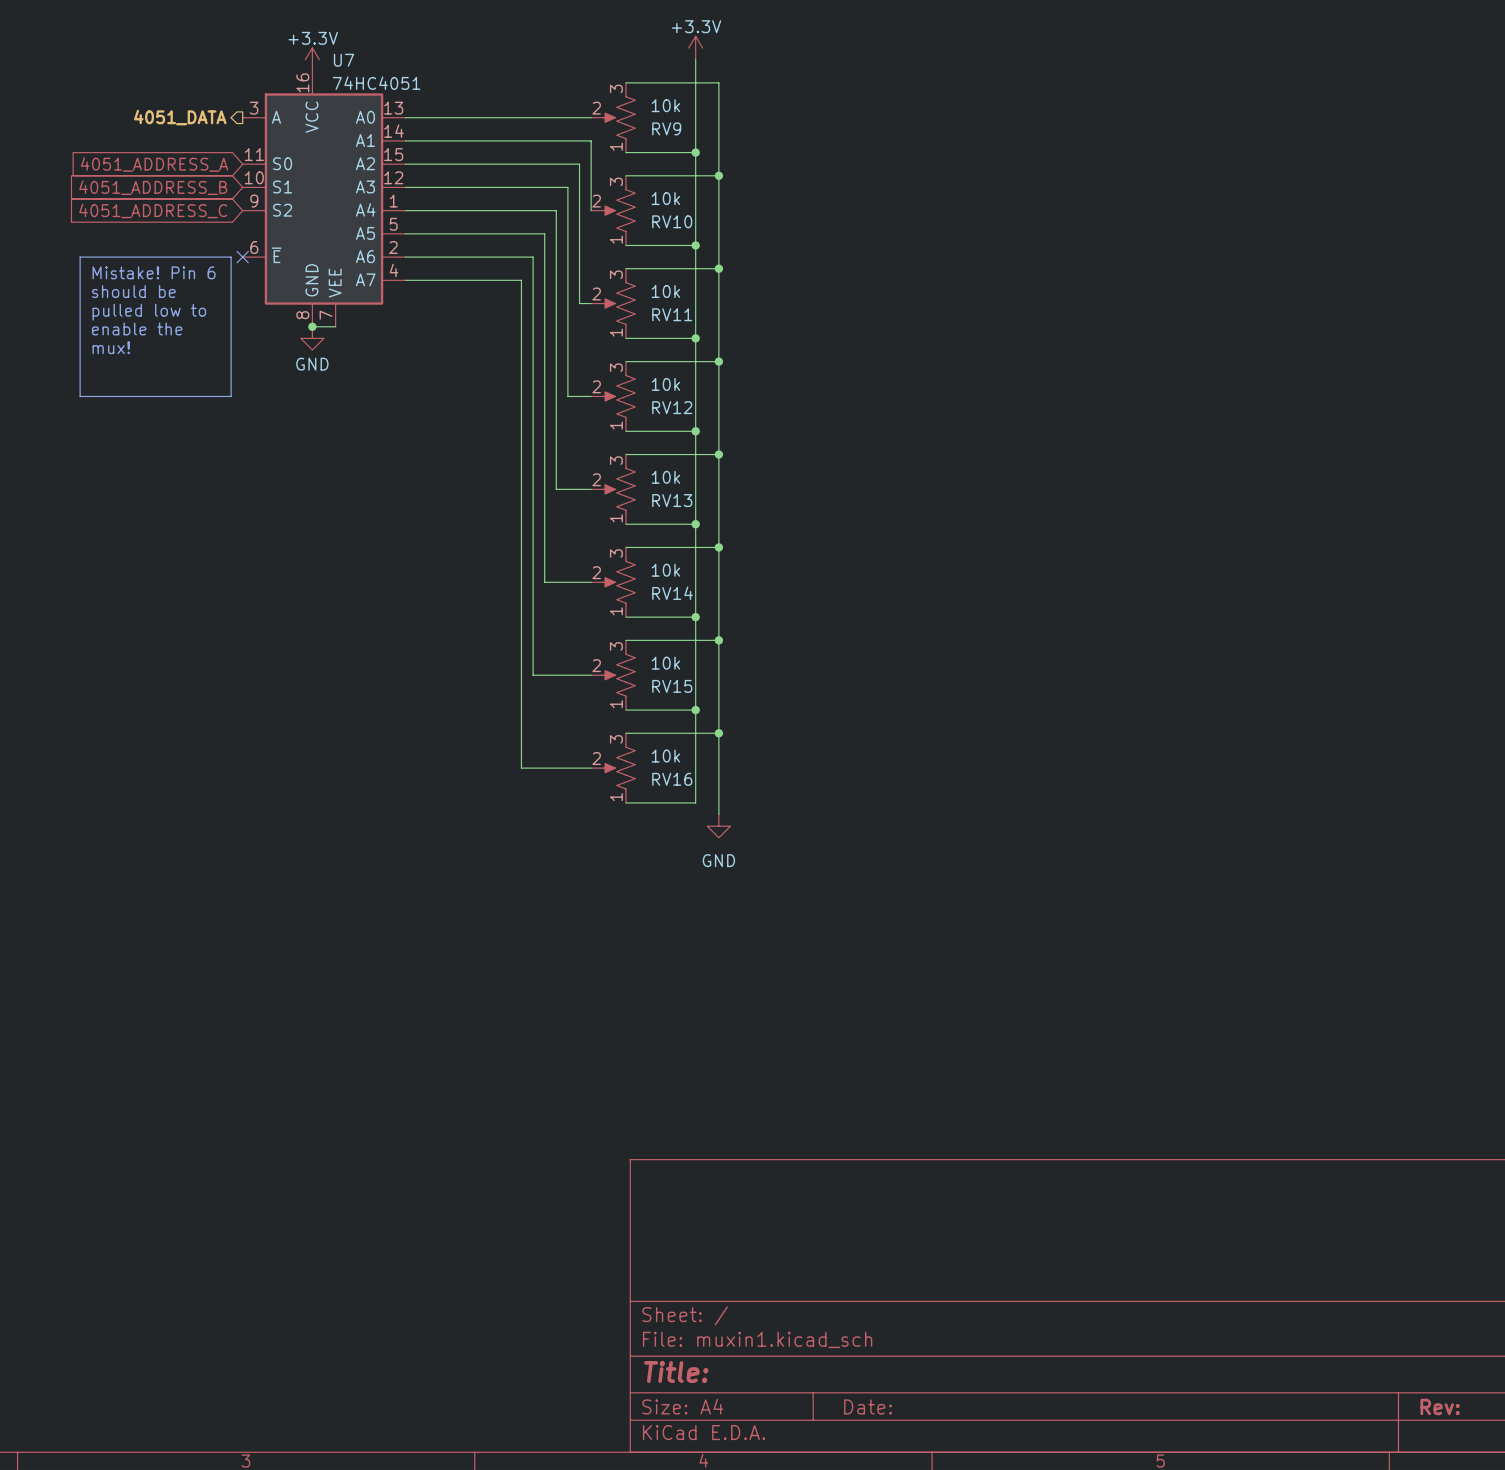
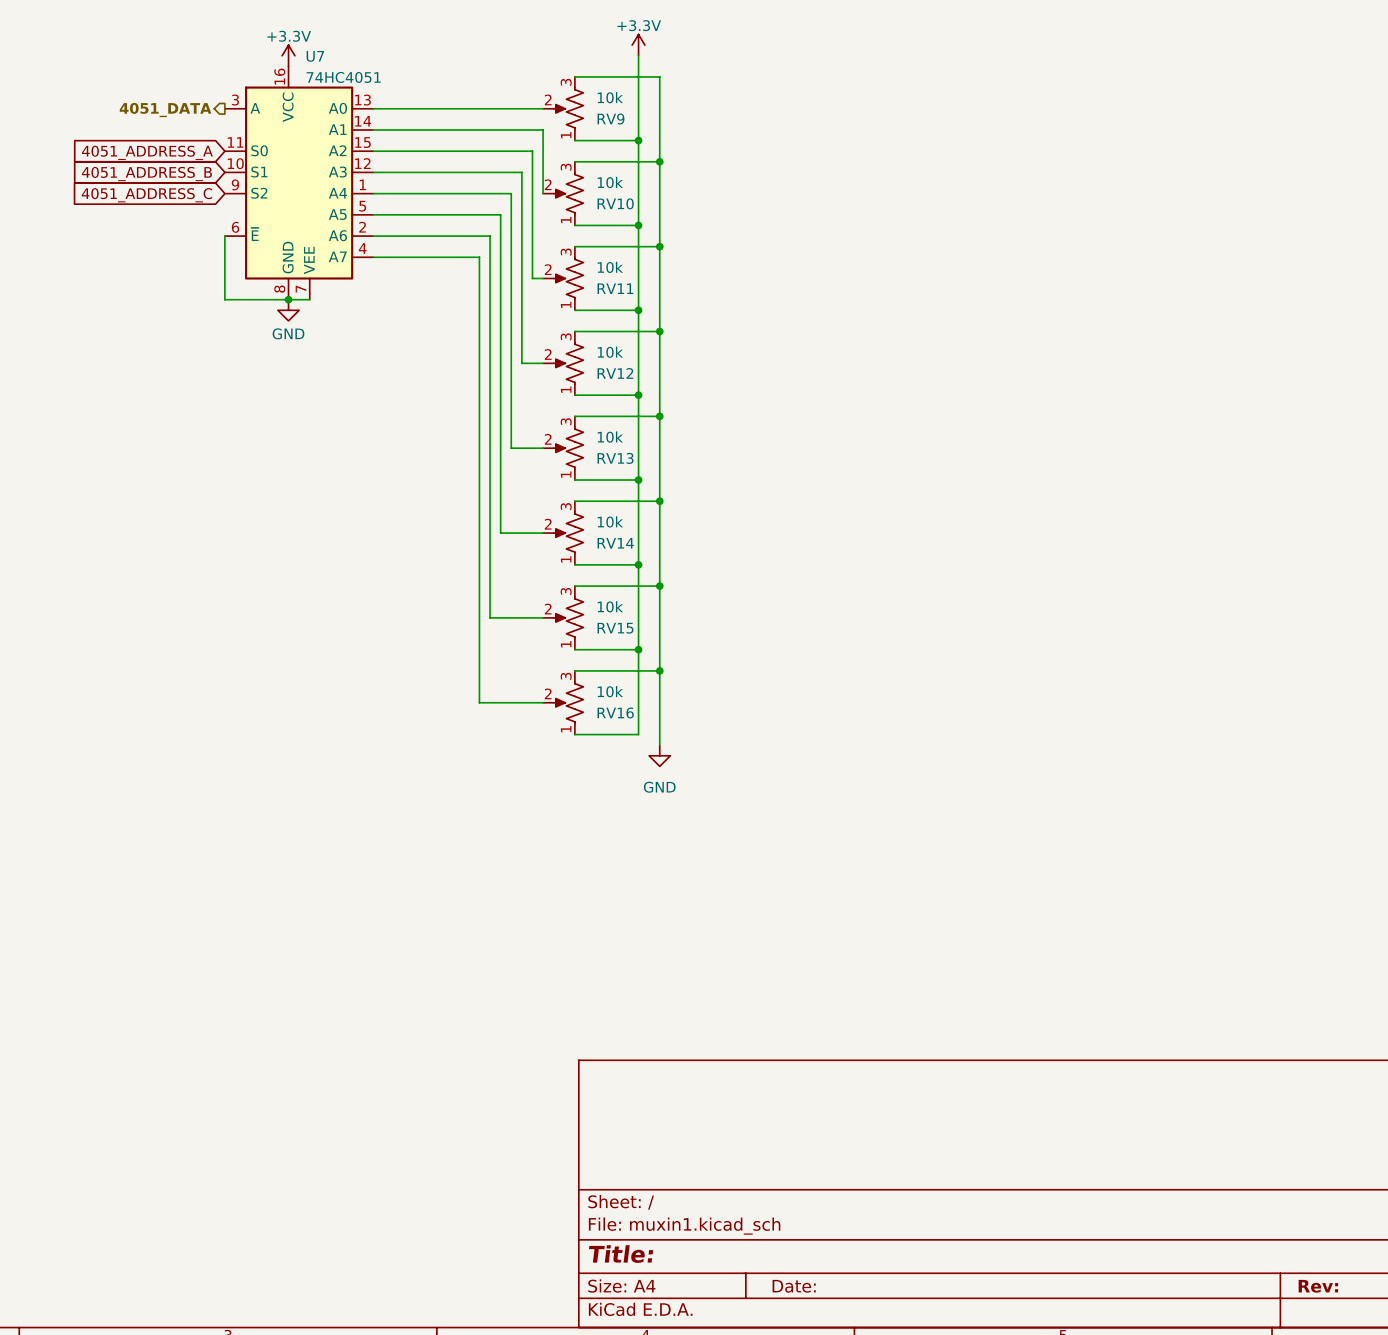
line: (80, 257) (231, 257) (231, 396) (80, 396) (80, 257) -> none
wire: none -> (224, 236) (224, 299) (288, 299)
no-connect mark: (242, 257) -> none
text: Mistake! Pin 6 (154, 272) -> none
text: should be (133, 291) -> none
text: pulled low to (149, 312) -> none
text: enable the (137, 328) -> none
text: mux! (111, 347) -> none

